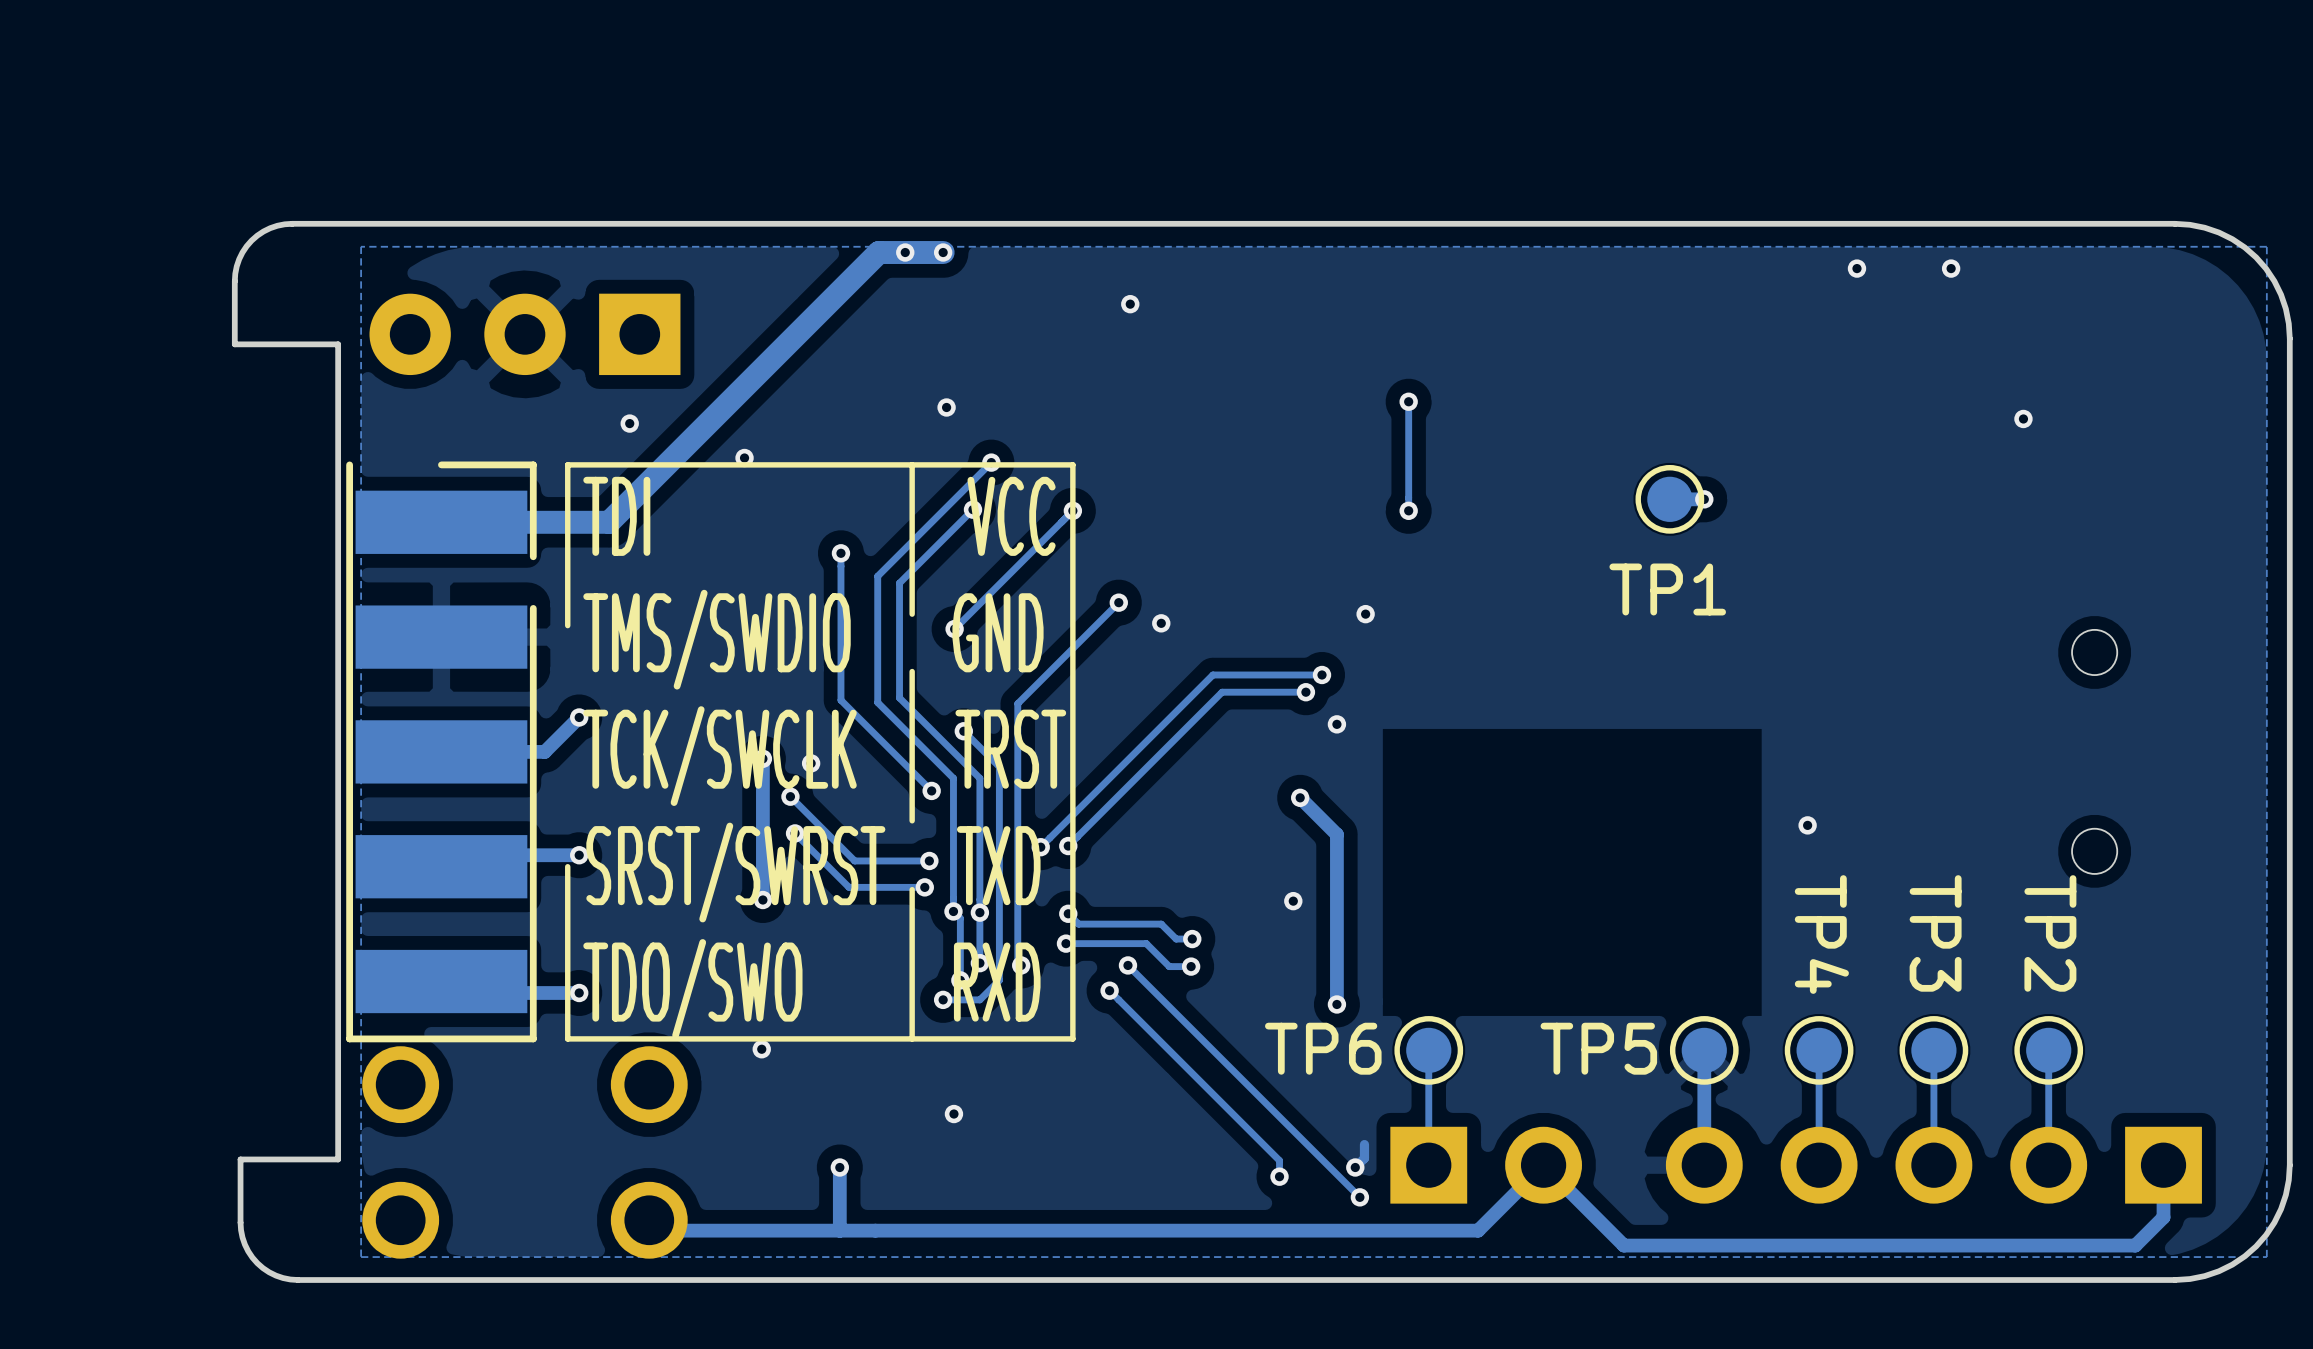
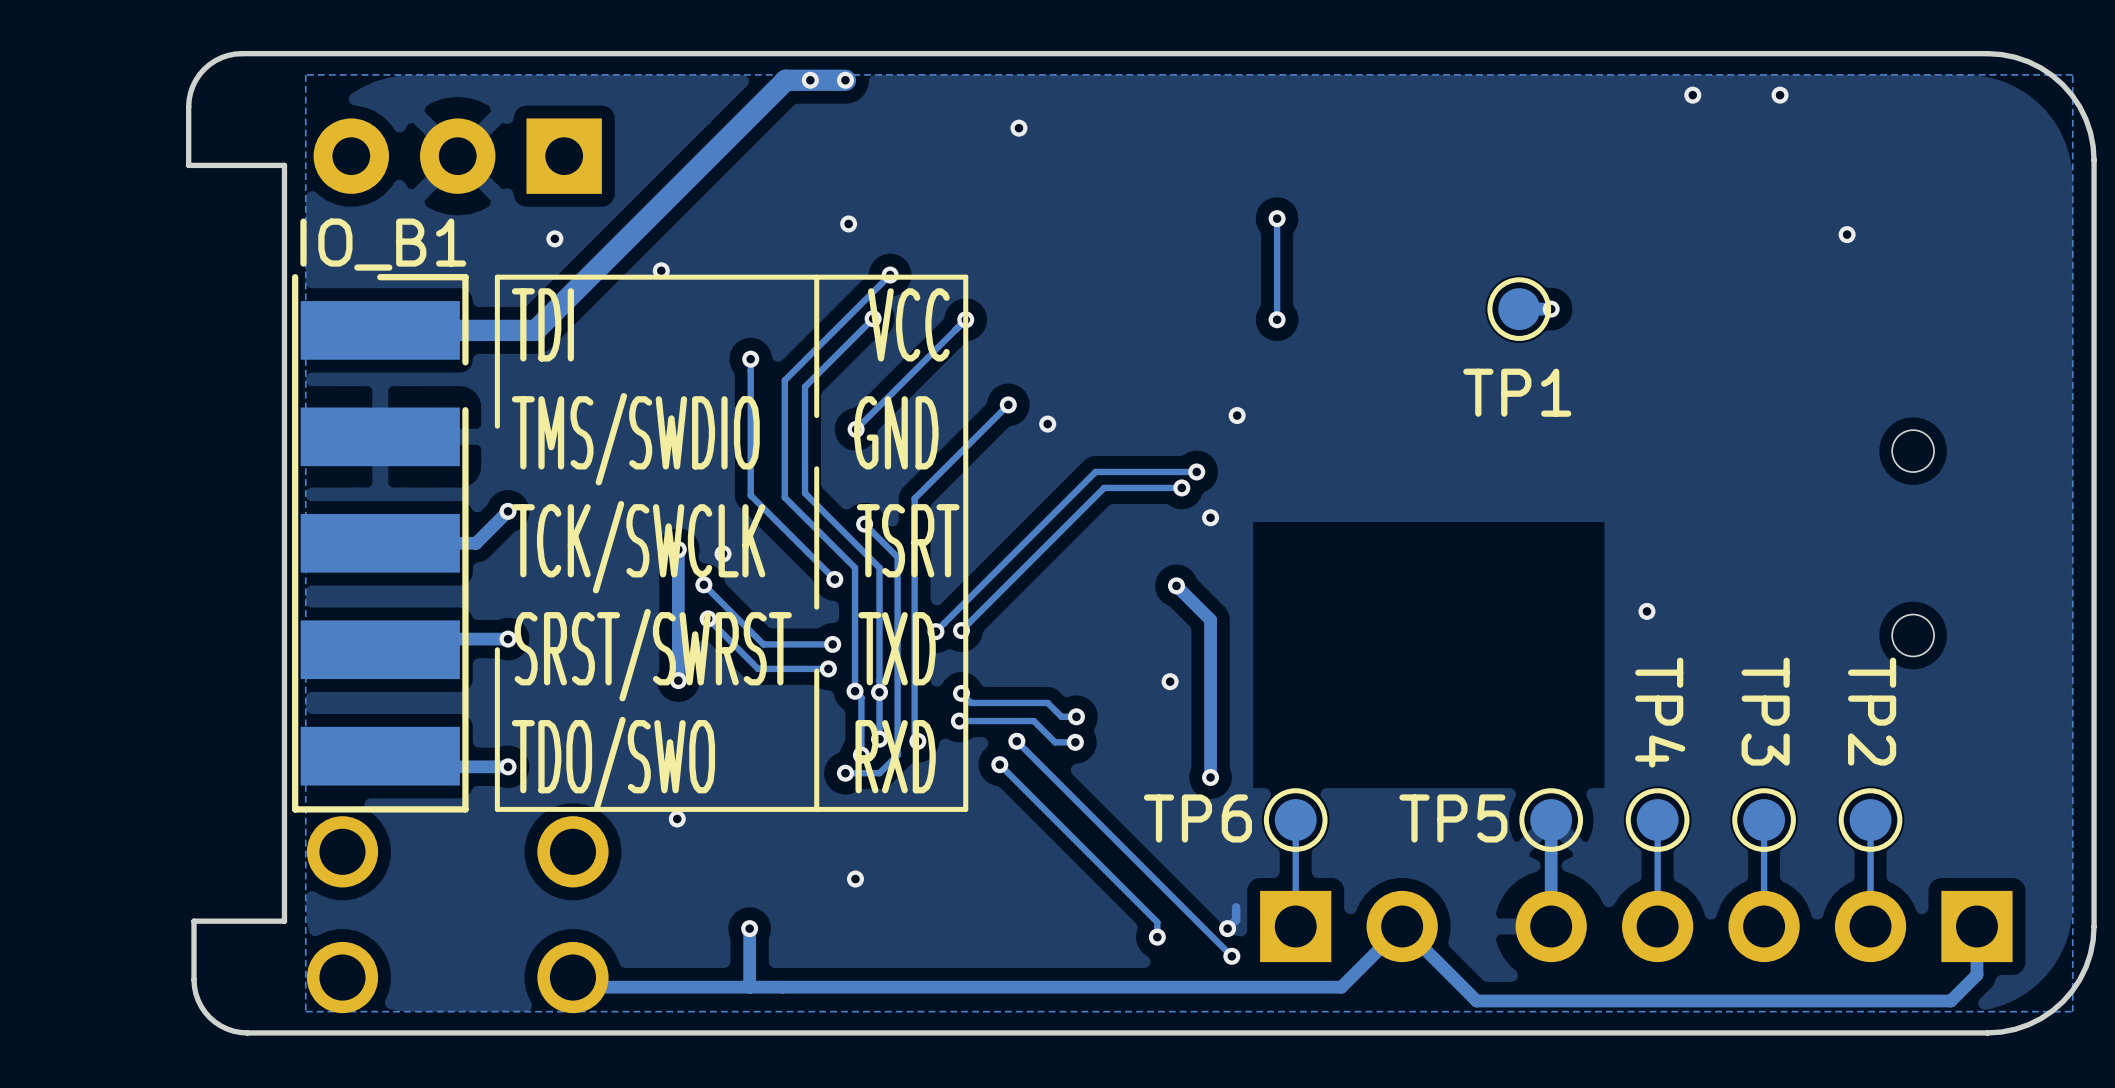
IO_B1 name: none -> IO_B1 (383, 244)
text: TCK/SWCLK TRST (824, 756) -> TCK/SWCLK TSRT (735, 547)

